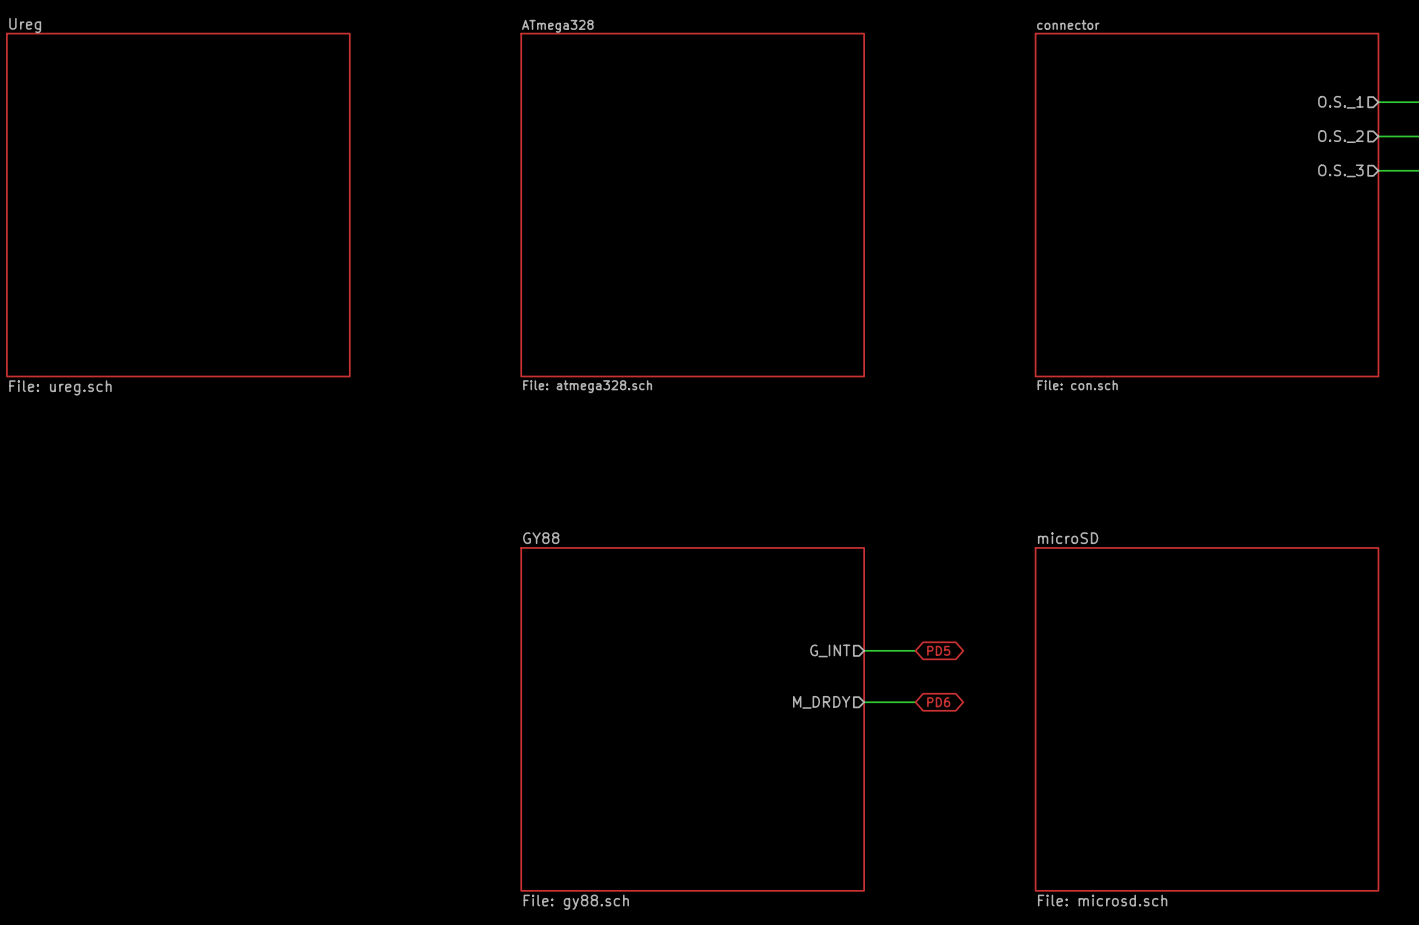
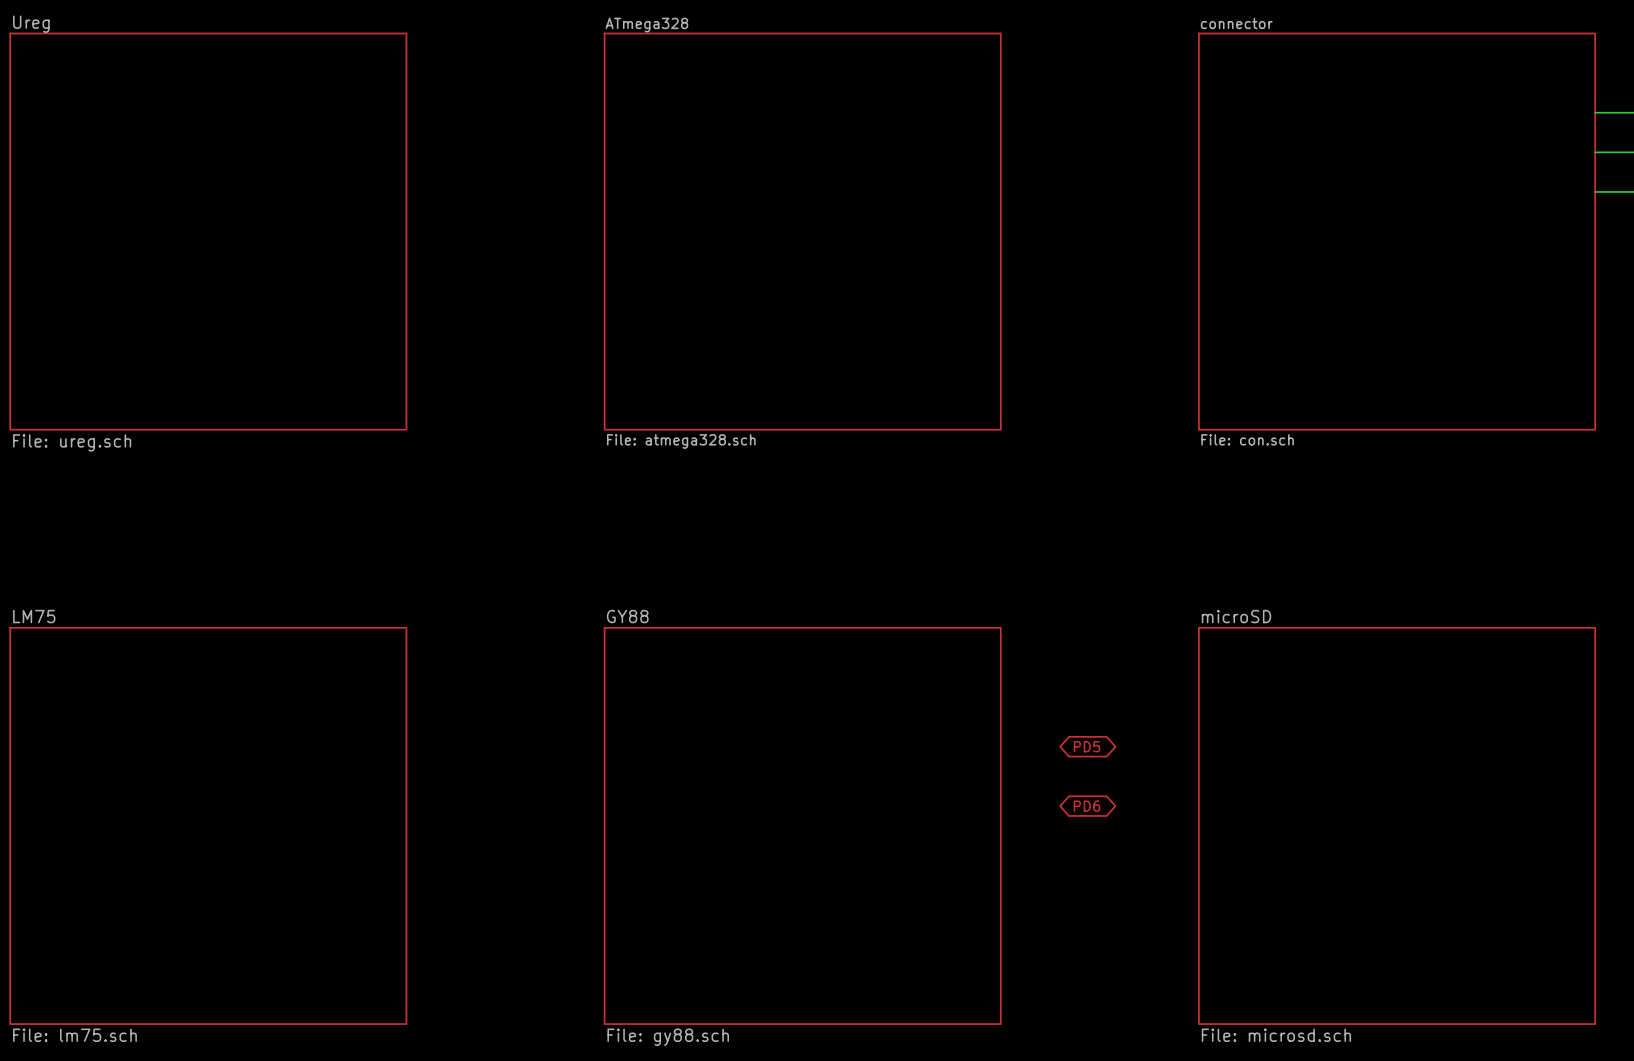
sheet pin: O.S._1 (1340, 102) -> none
sheet pin: O.S._2 (1340, 136) -> none
sheet pin: O.S._3 (1340, 170) -> none
sheet pin: G_INT (830, 650) -> none
wire: (864, 650) (915, 650) -> none
sheet pin: M_DRDY (821, 702) -> none
wire: (864, 702) (915, 702) -> none
sheet LM75: none -> File: lm75.sch (208, 825)

